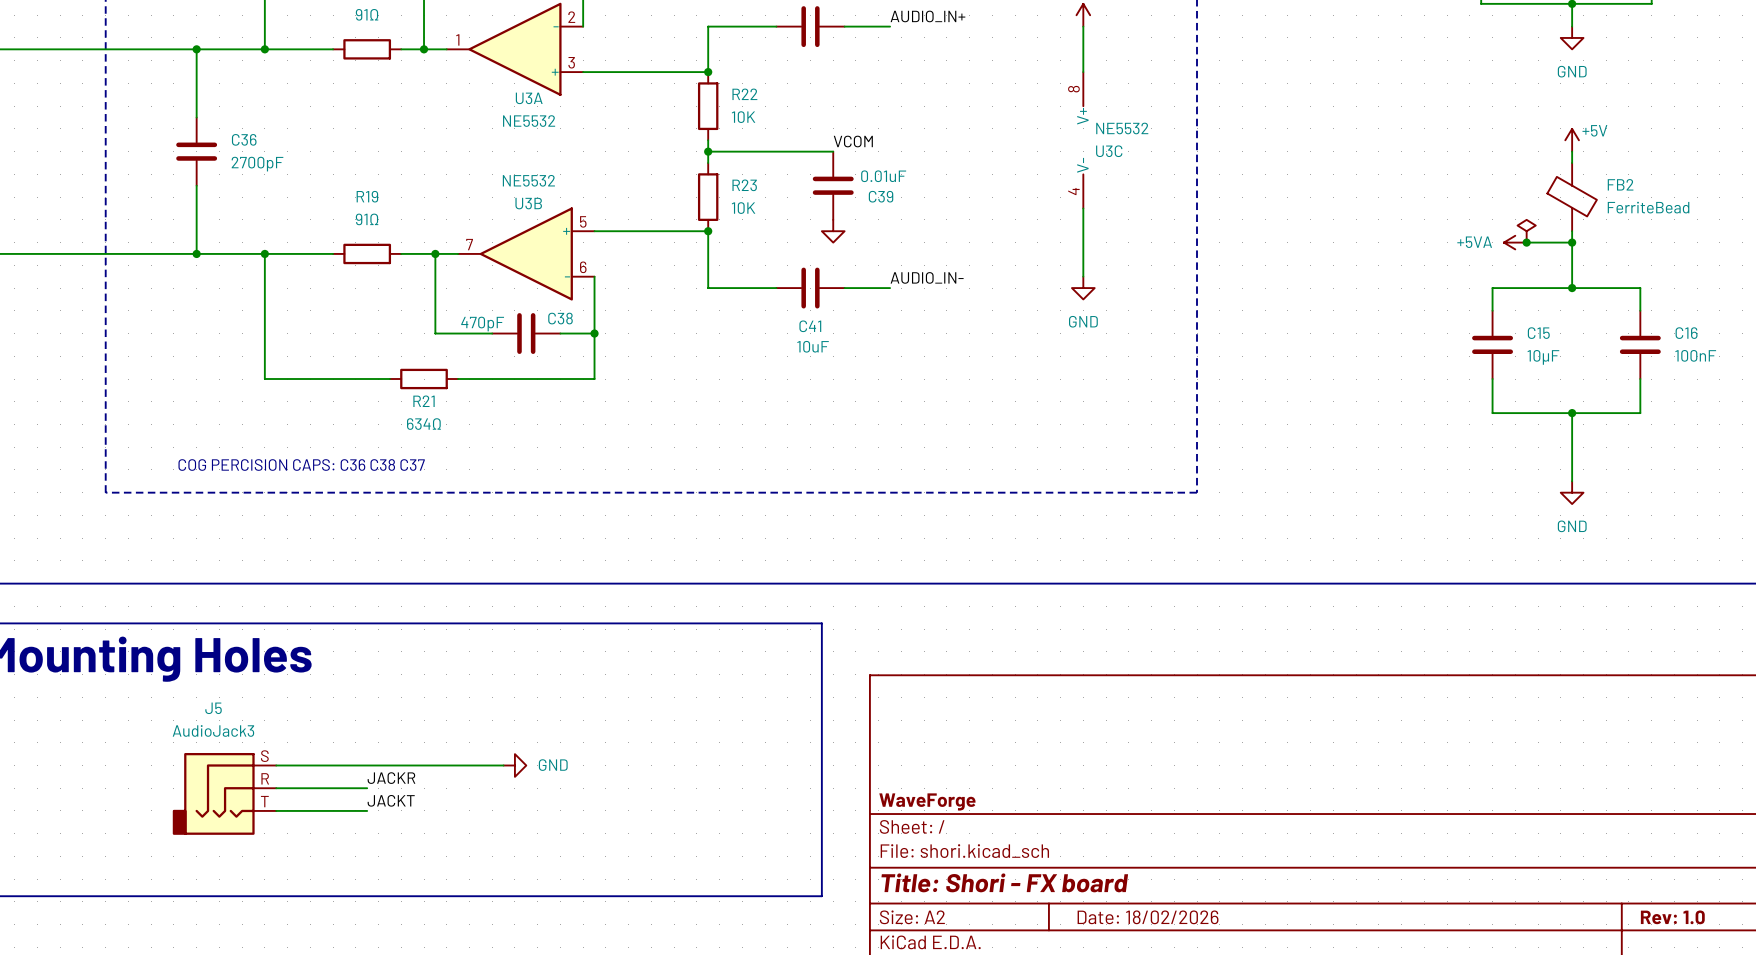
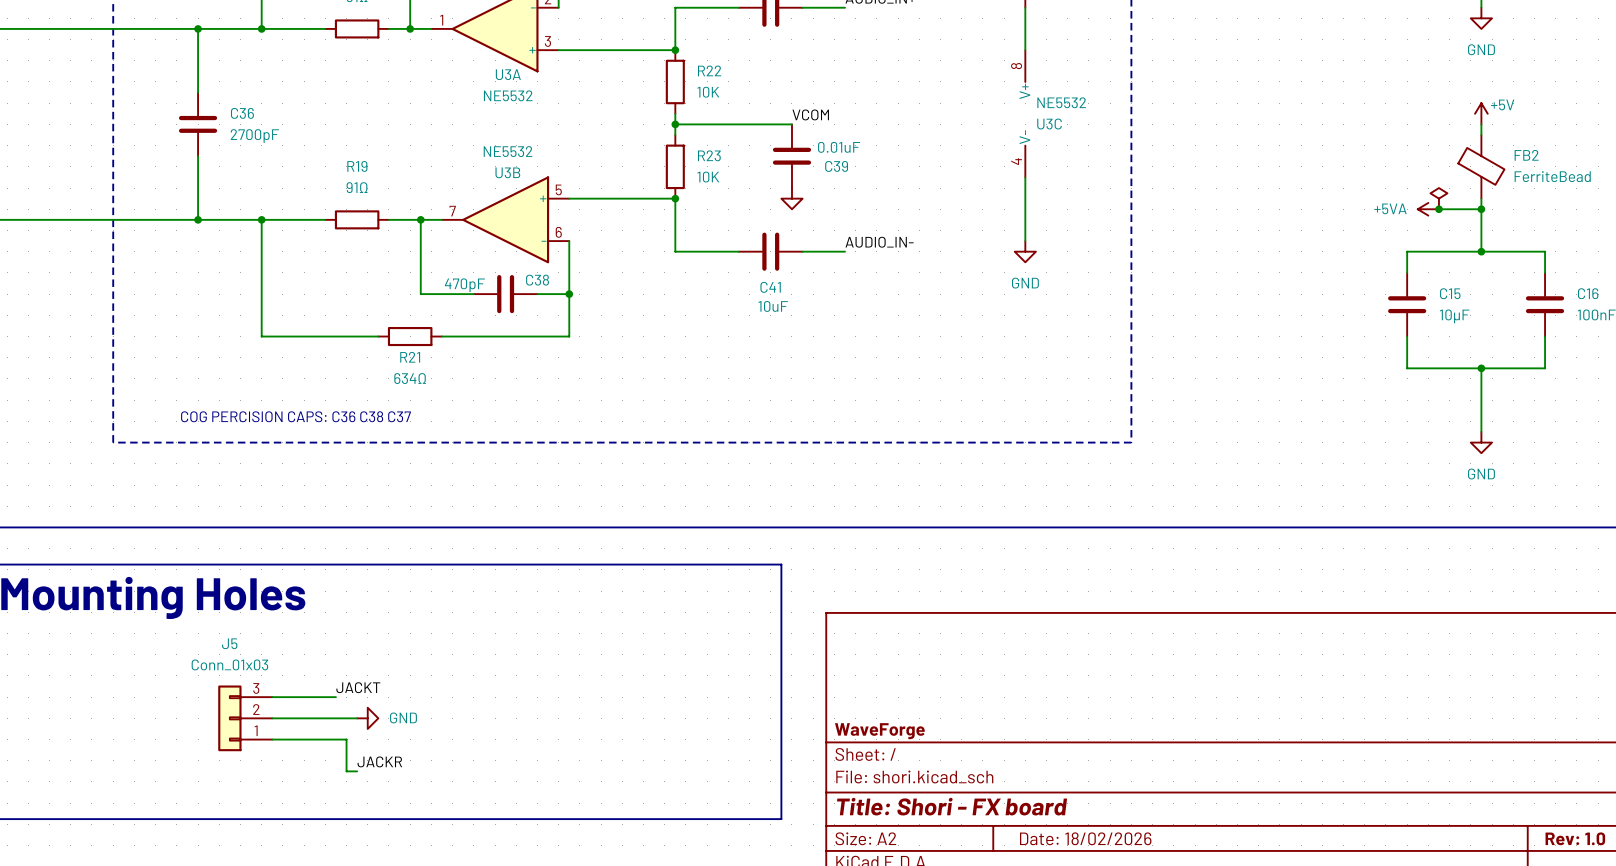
J5 value: AudioJack3 (213, 730) -> Conn_01x03 (229, 664)
J5 symbol: [172, 752, 277, 835] -> [218, 685, 273, 752]
wire: (344, 765) (503, 765) -> none
power symbol position: GND (514, 765) -> GND (367, 718)
label position: JACKR (391, 778) -> JACKR (379, 761)
label position: JACKT (391, 800) -> JACKT (358, 687)
wire: (355, 810) (367, 810) -> (346, 739) (346, 771) (357, 771)

